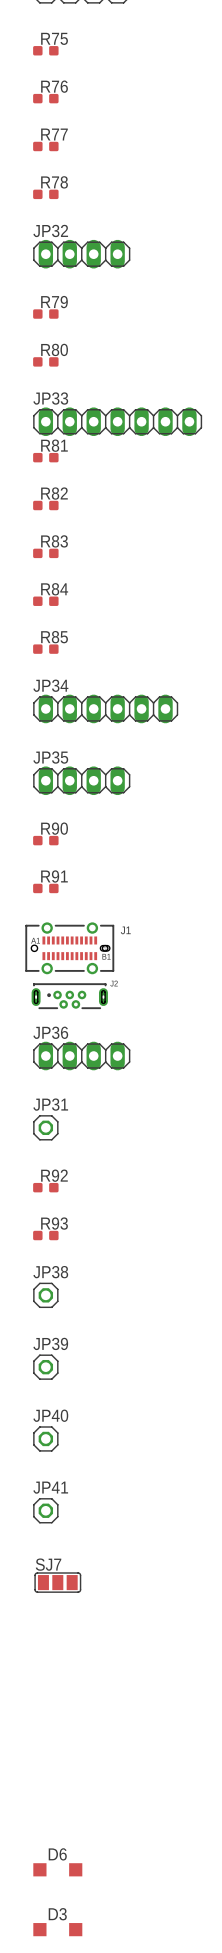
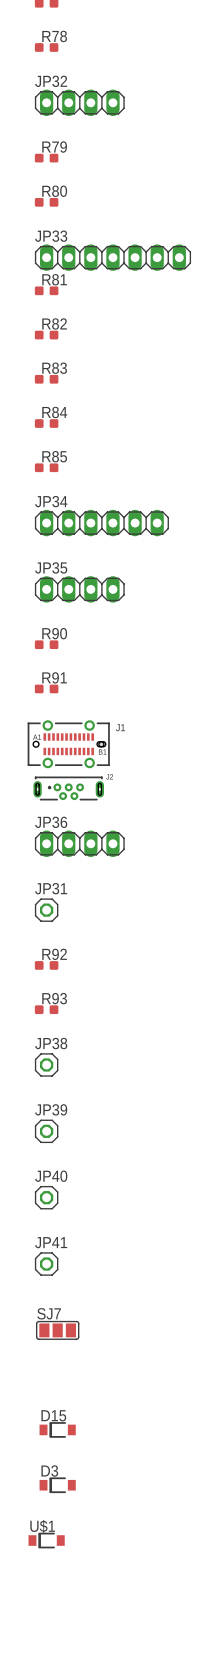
D15: none -> (57, 1429)
U$1: none -> (46, 1540)
D6: (57, 1869) -> none
D3 footprint: [33, 1923, 83, 1937] -> [39, 1477, 76, 1494]

